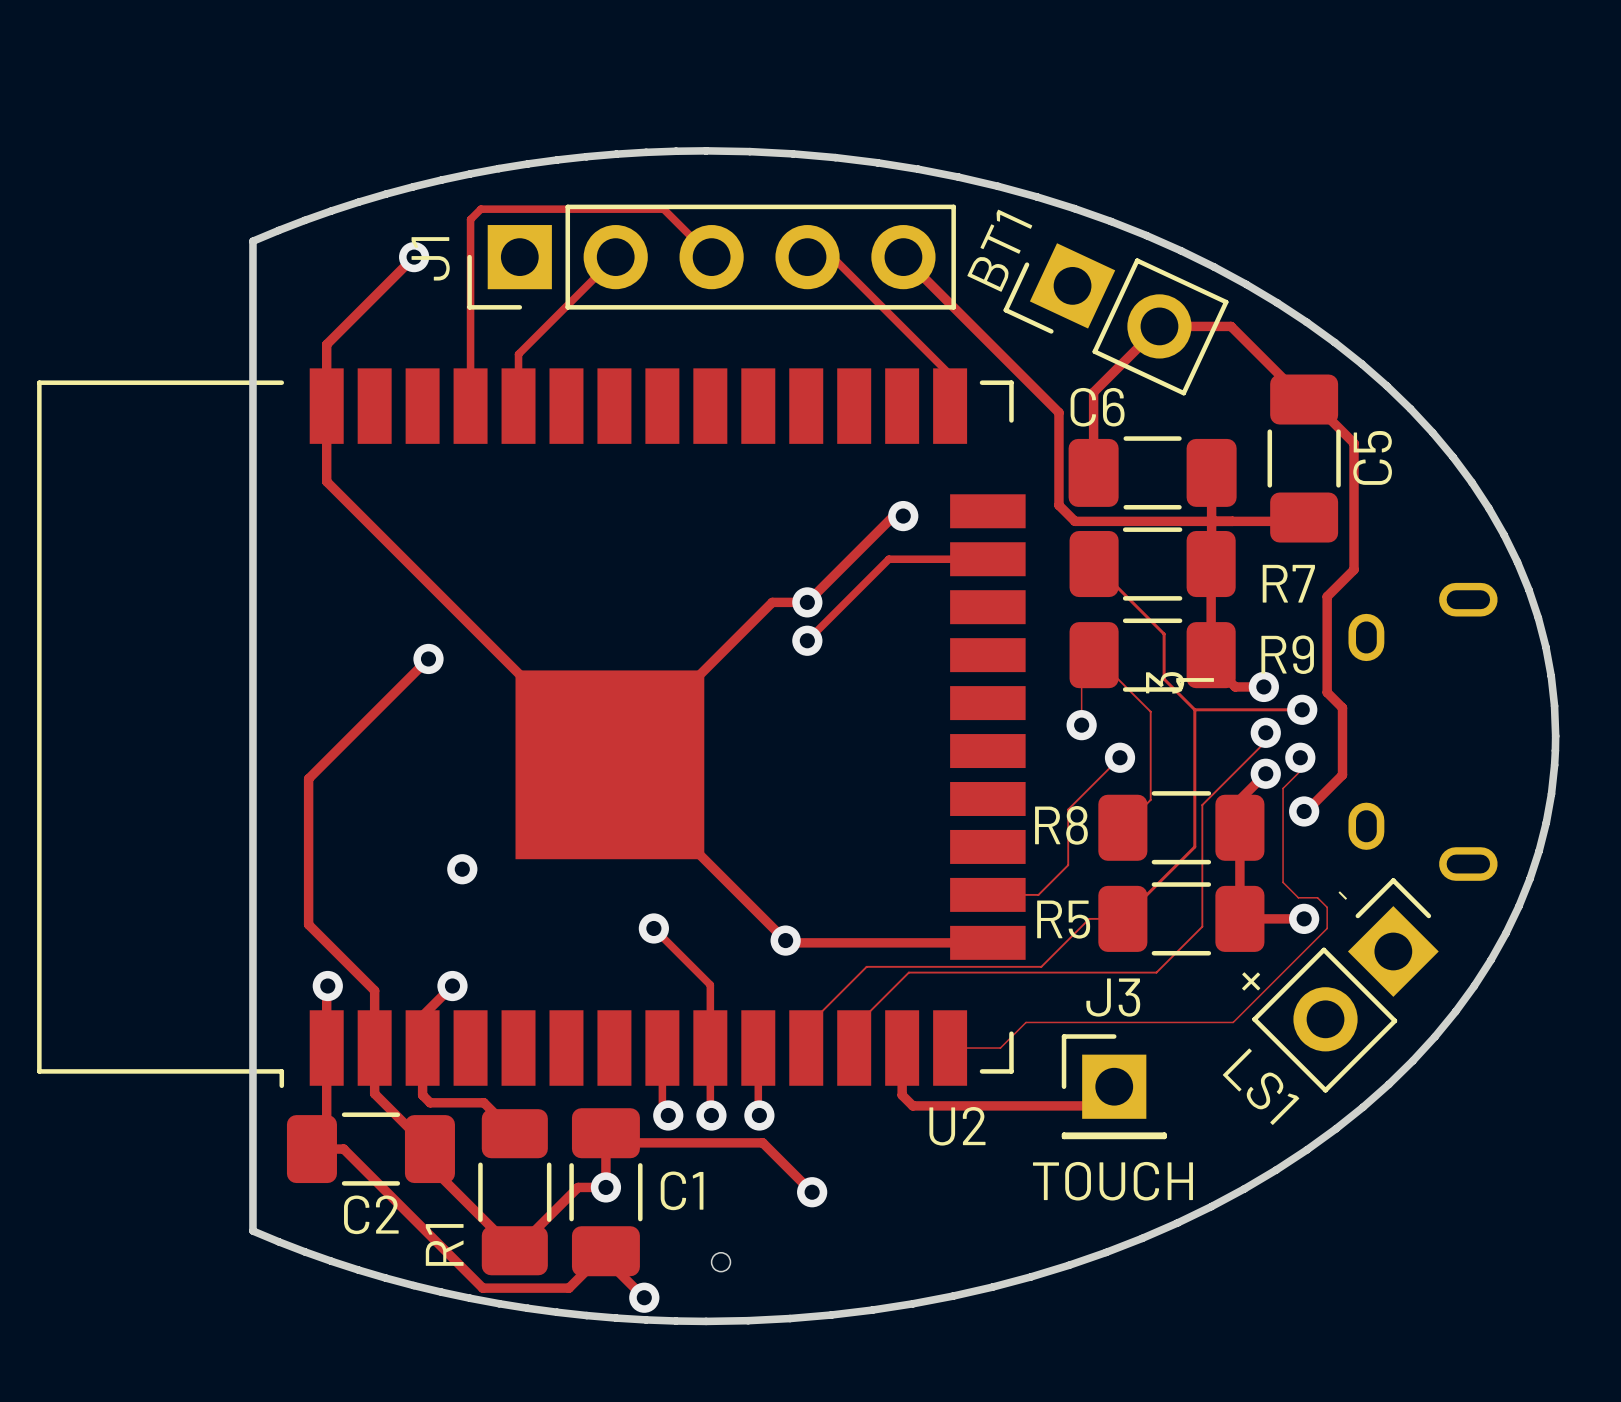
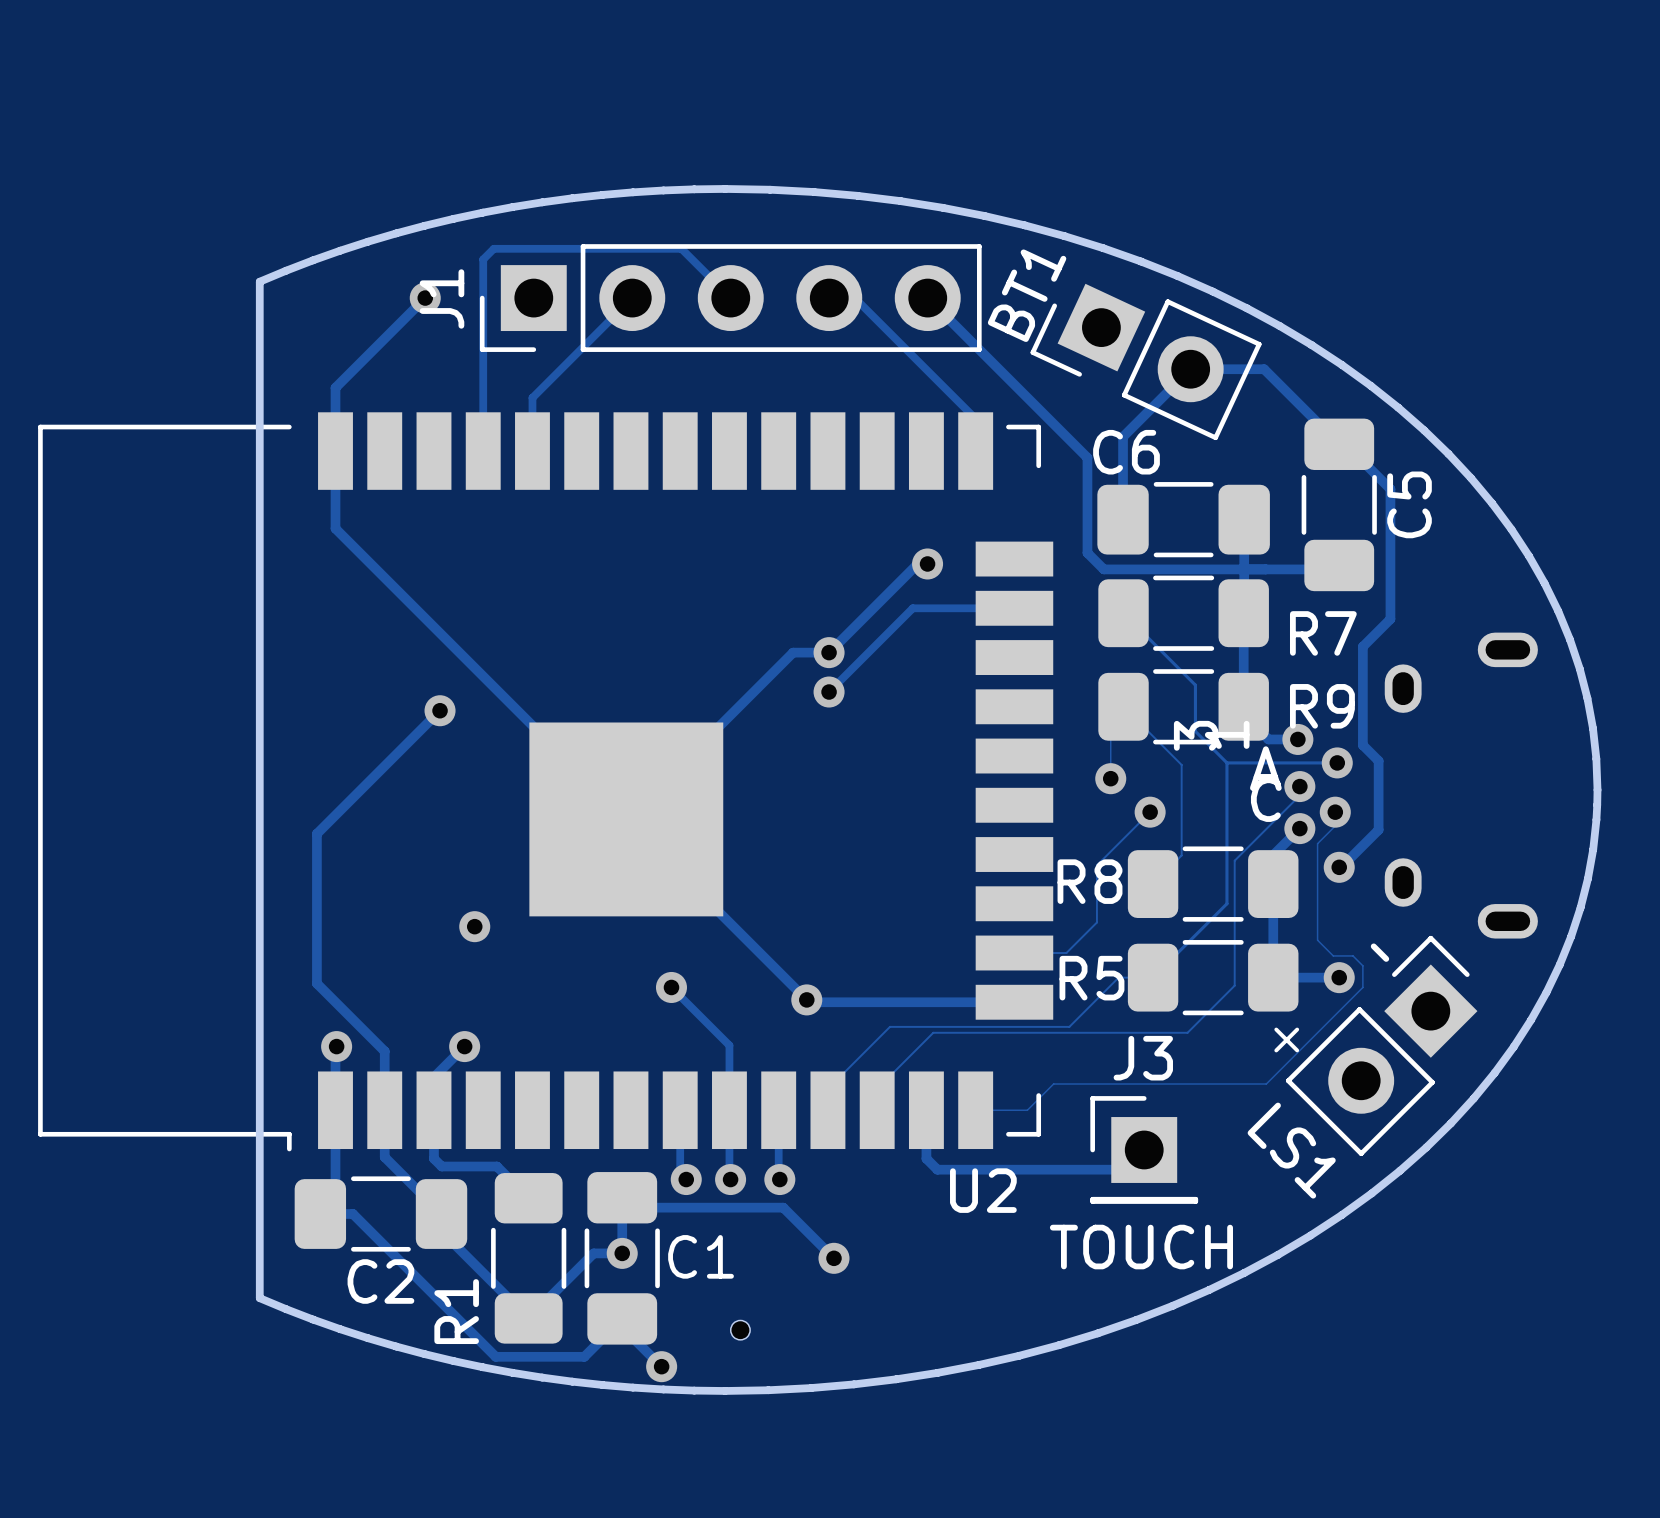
part: none -> (1227, 771)

